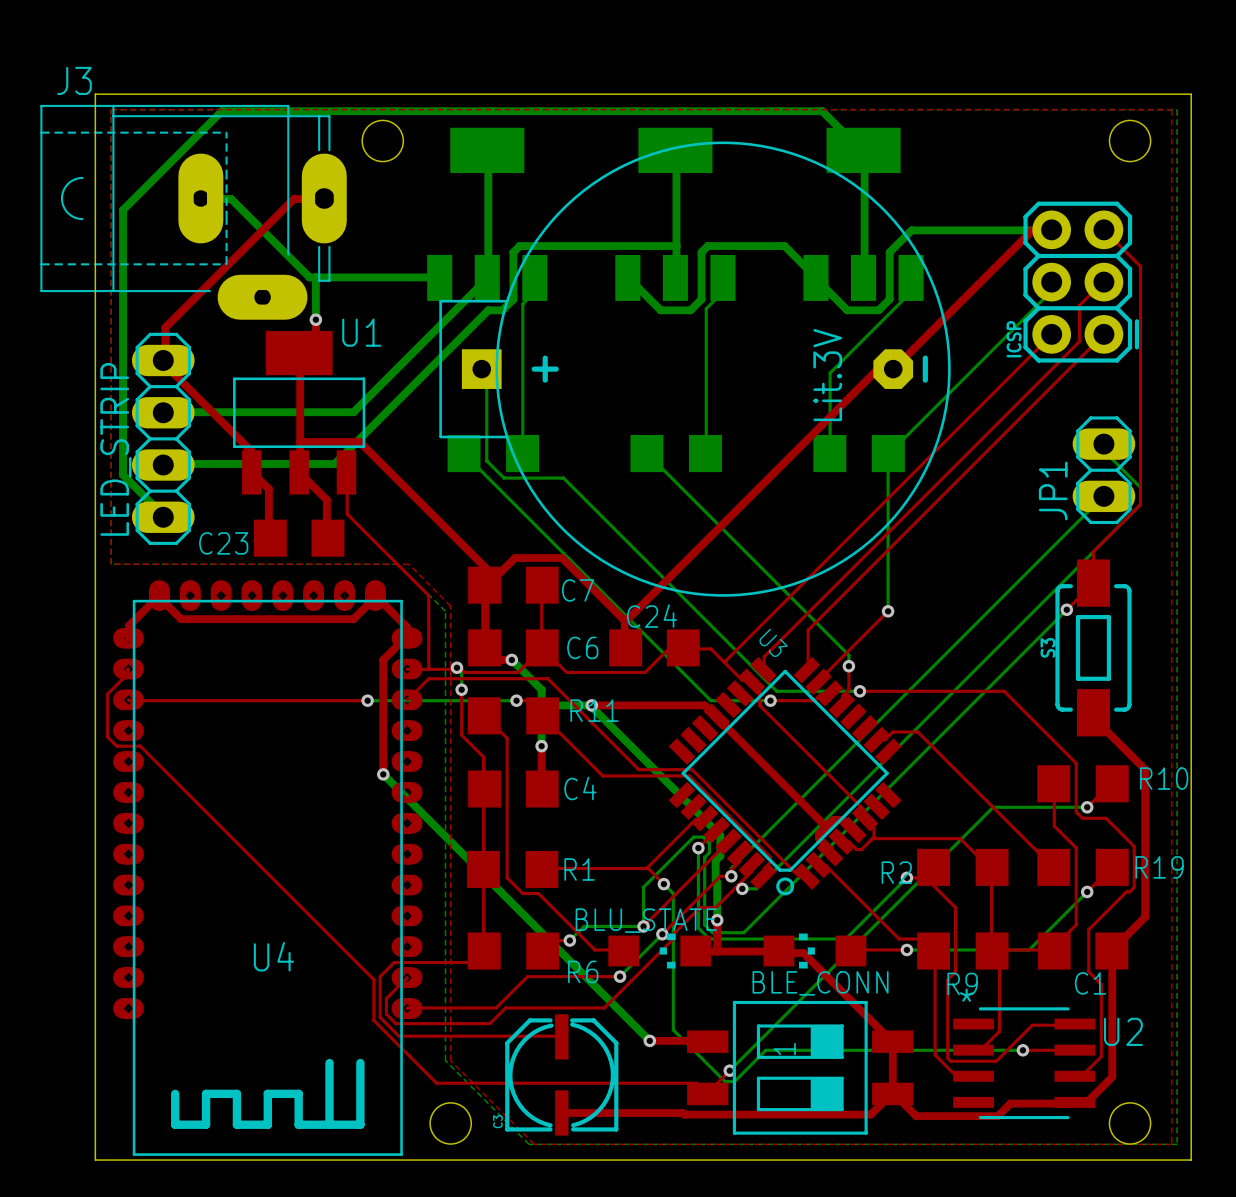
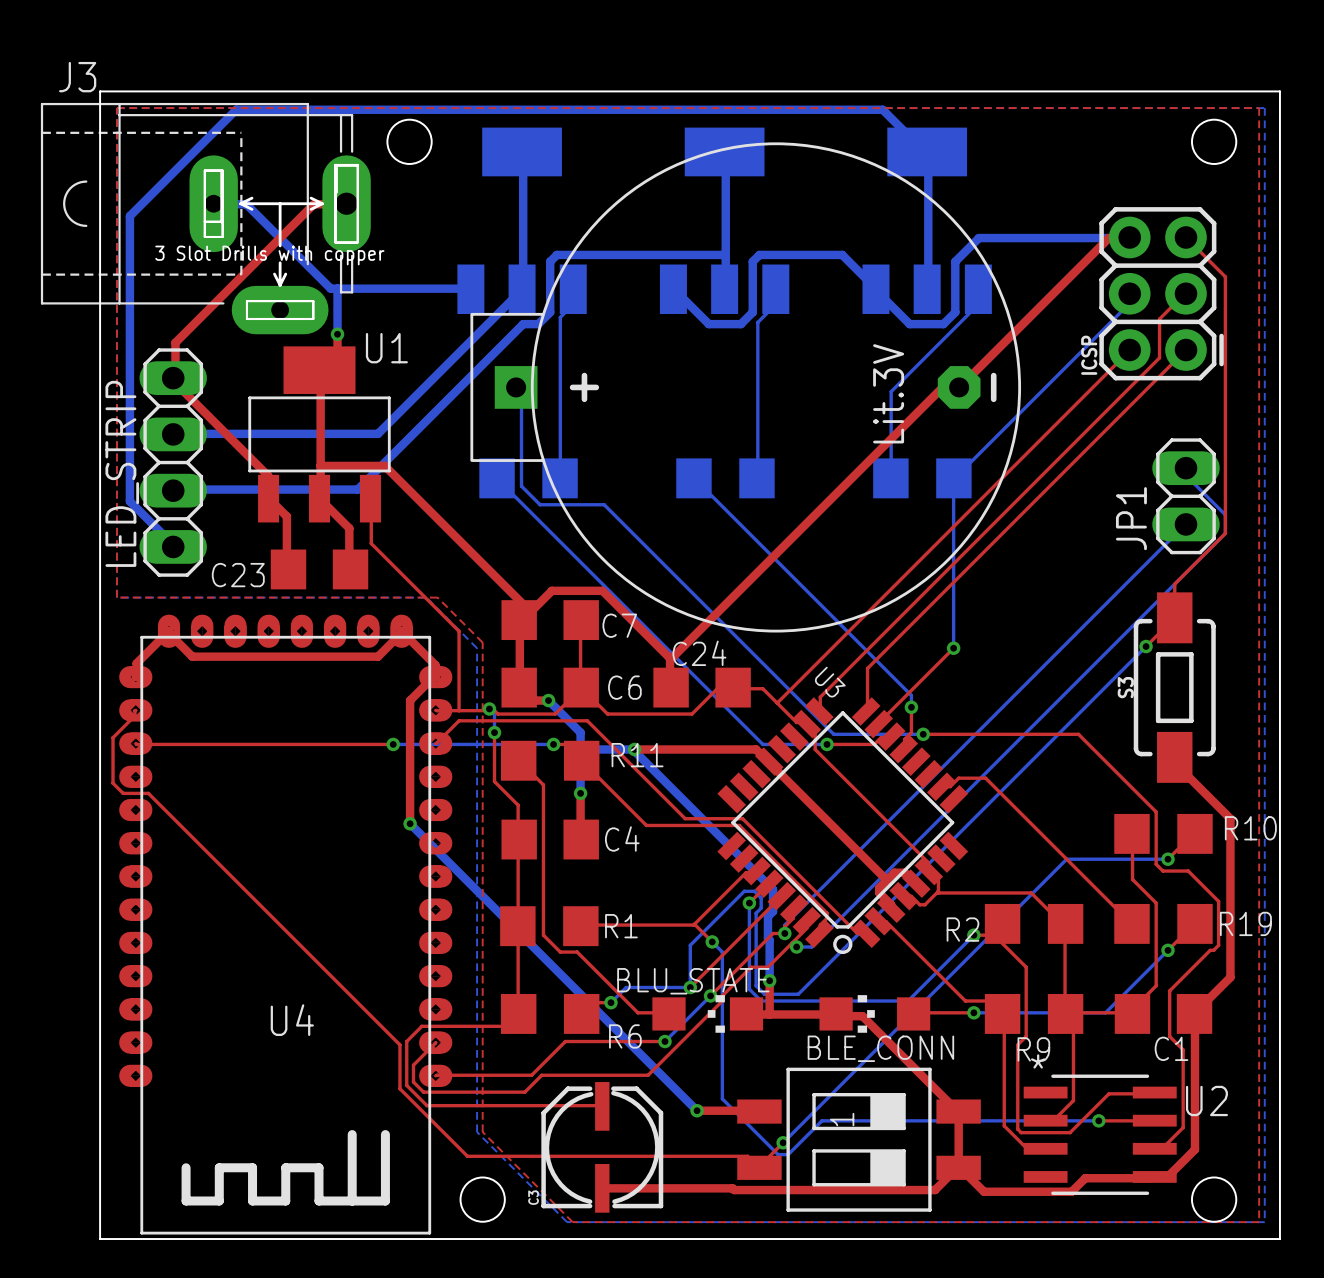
J3 footprint: [40, 104, 347, 320] -> [40, 102, 371, 335]

